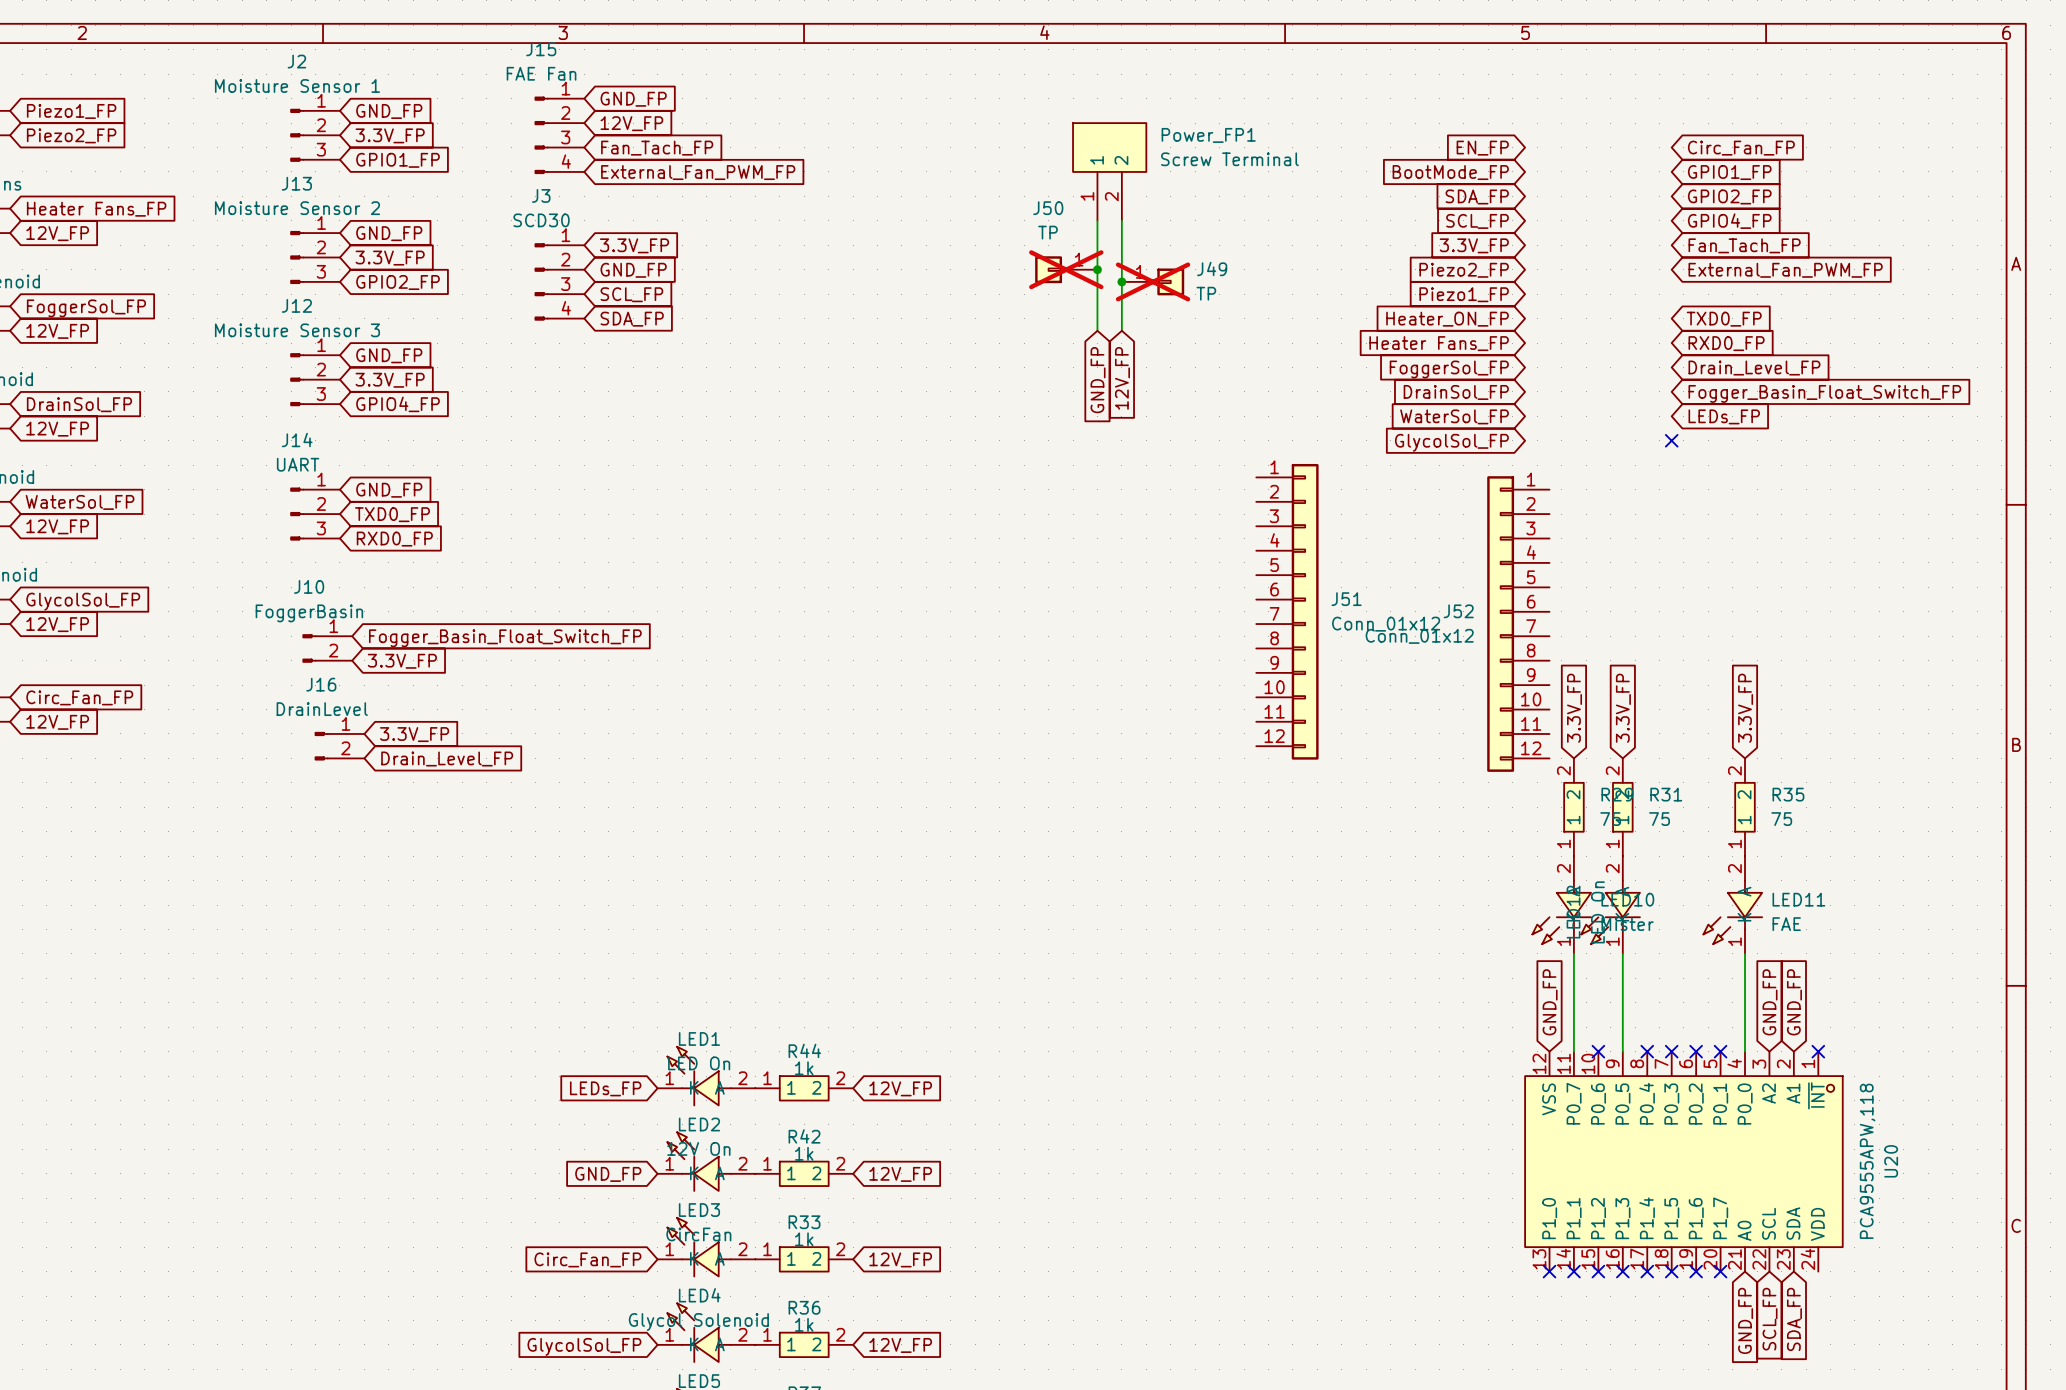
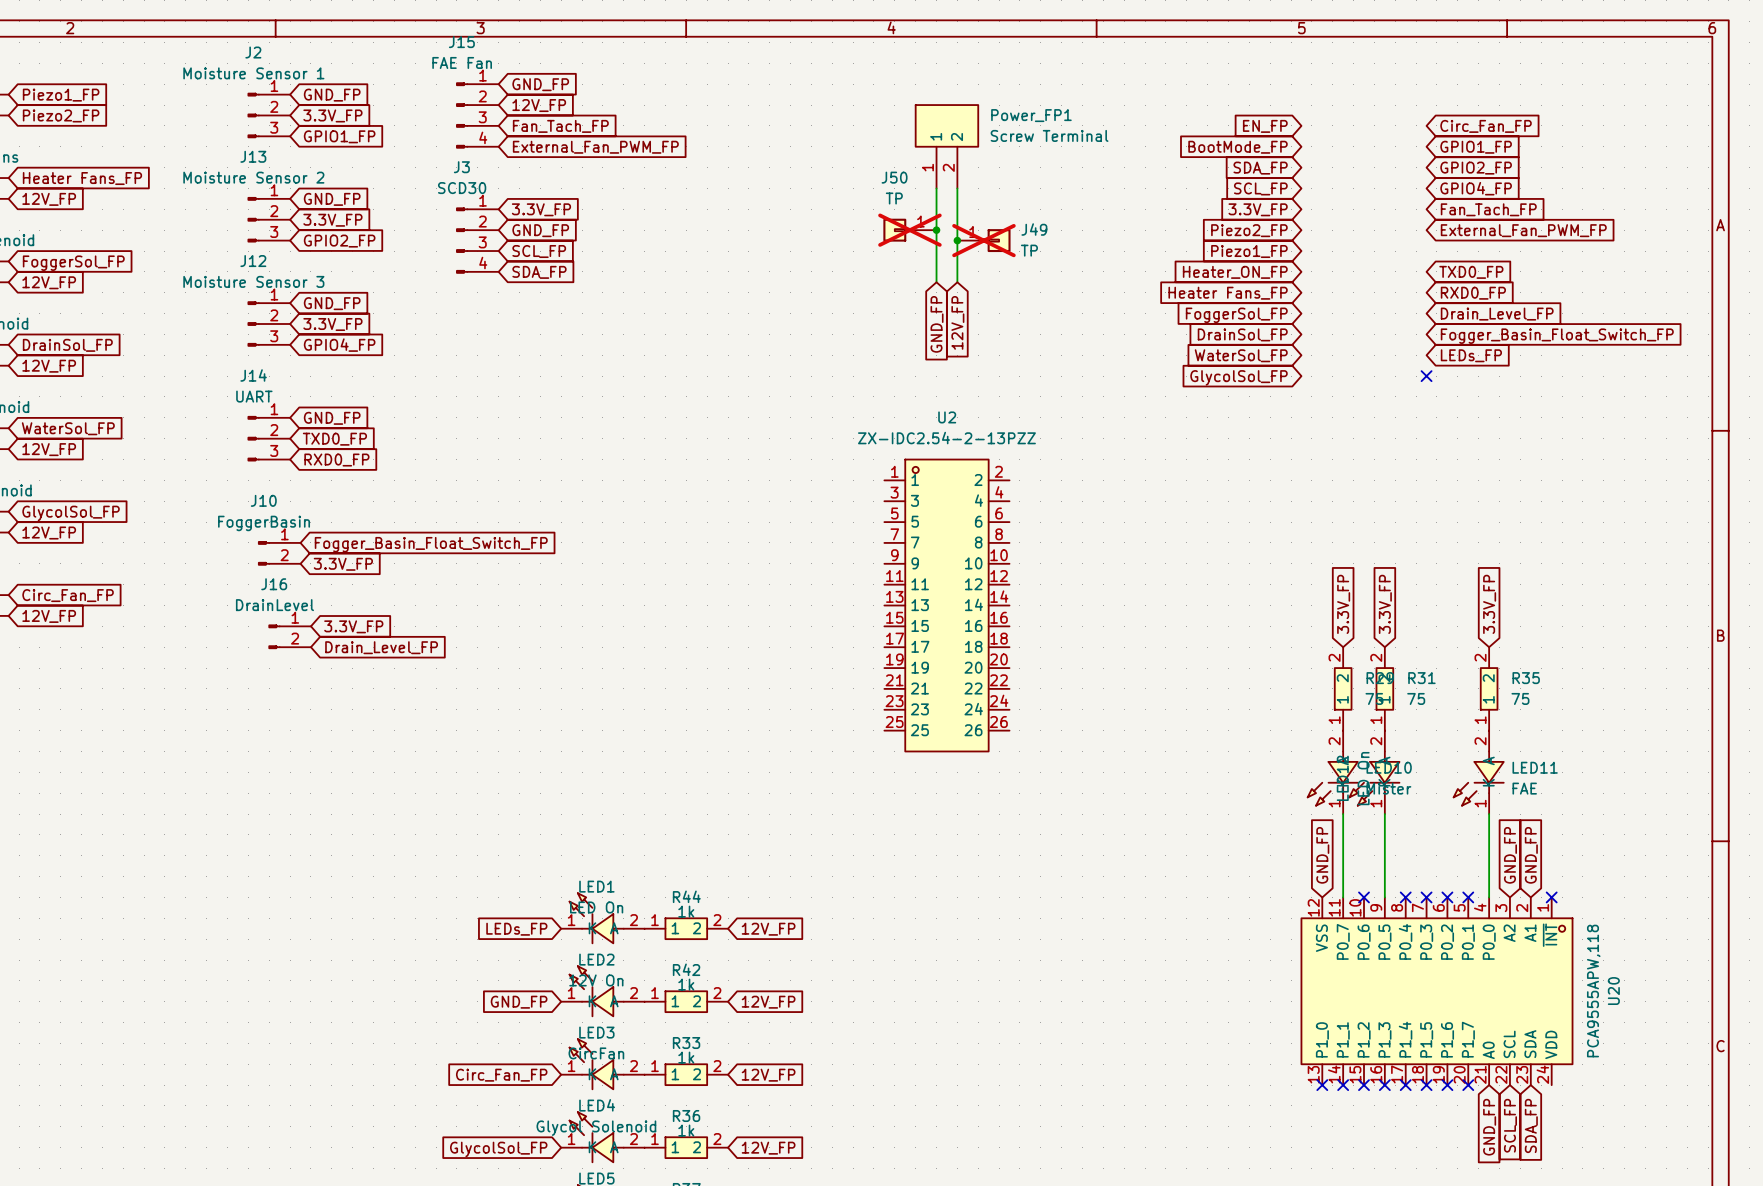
J51: Conn_01x12 (1287, 611) -> none
J52: Conn_01x12 (1518, 624) -> none
U2: none -> ZX-IDC2.54-2-13PZZ (946, 605)

